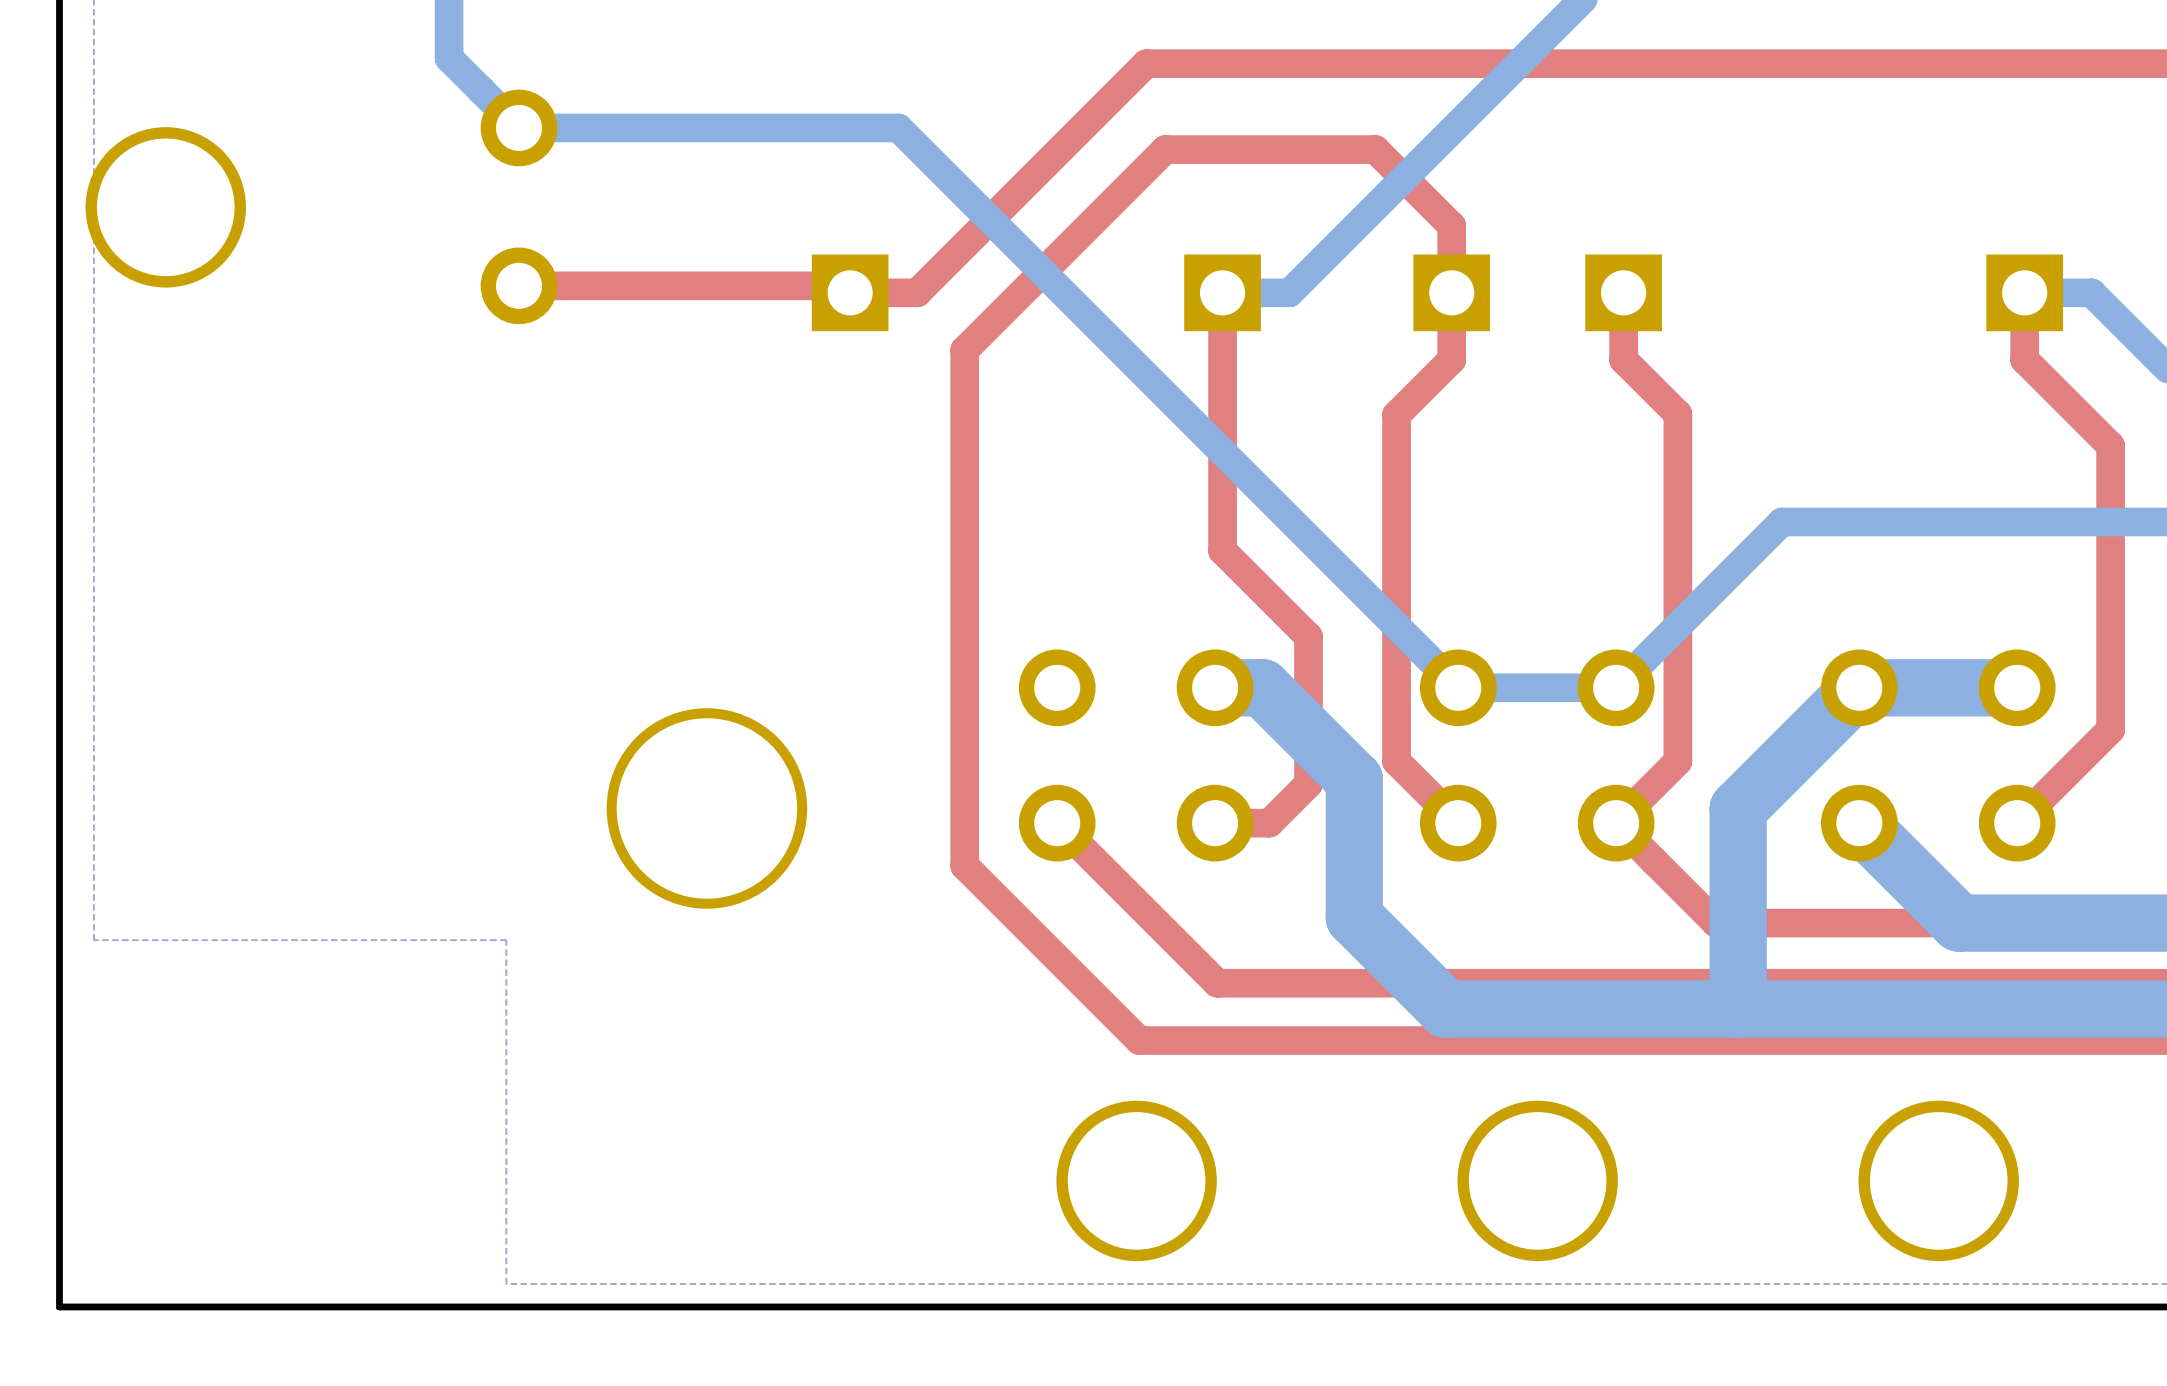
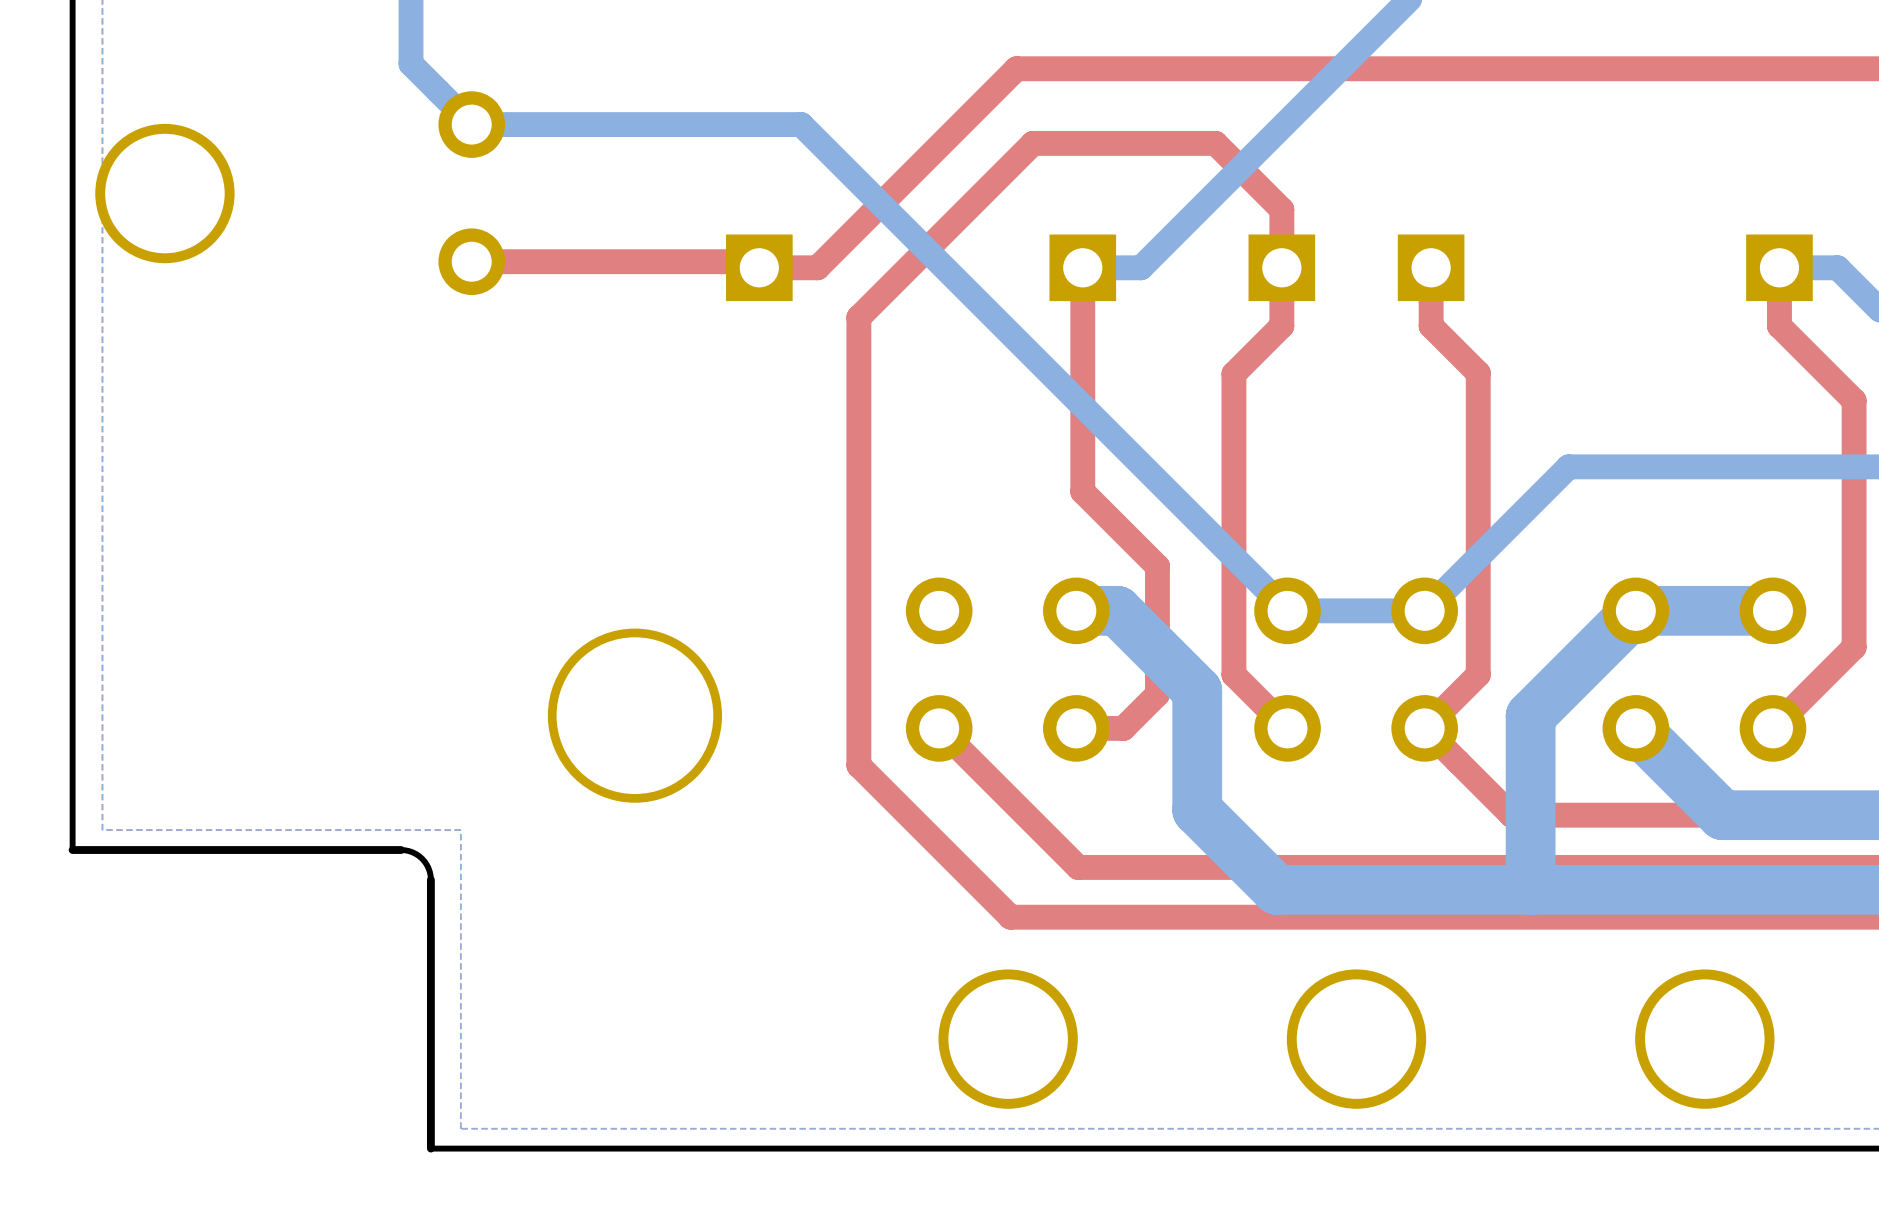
board edge: (59, 963) (59, 1306) (472, 1306) -> (72, 850) (401, 850) (412, 852) (419, 856) (428, 868) (430, 879) (430, 1148)

